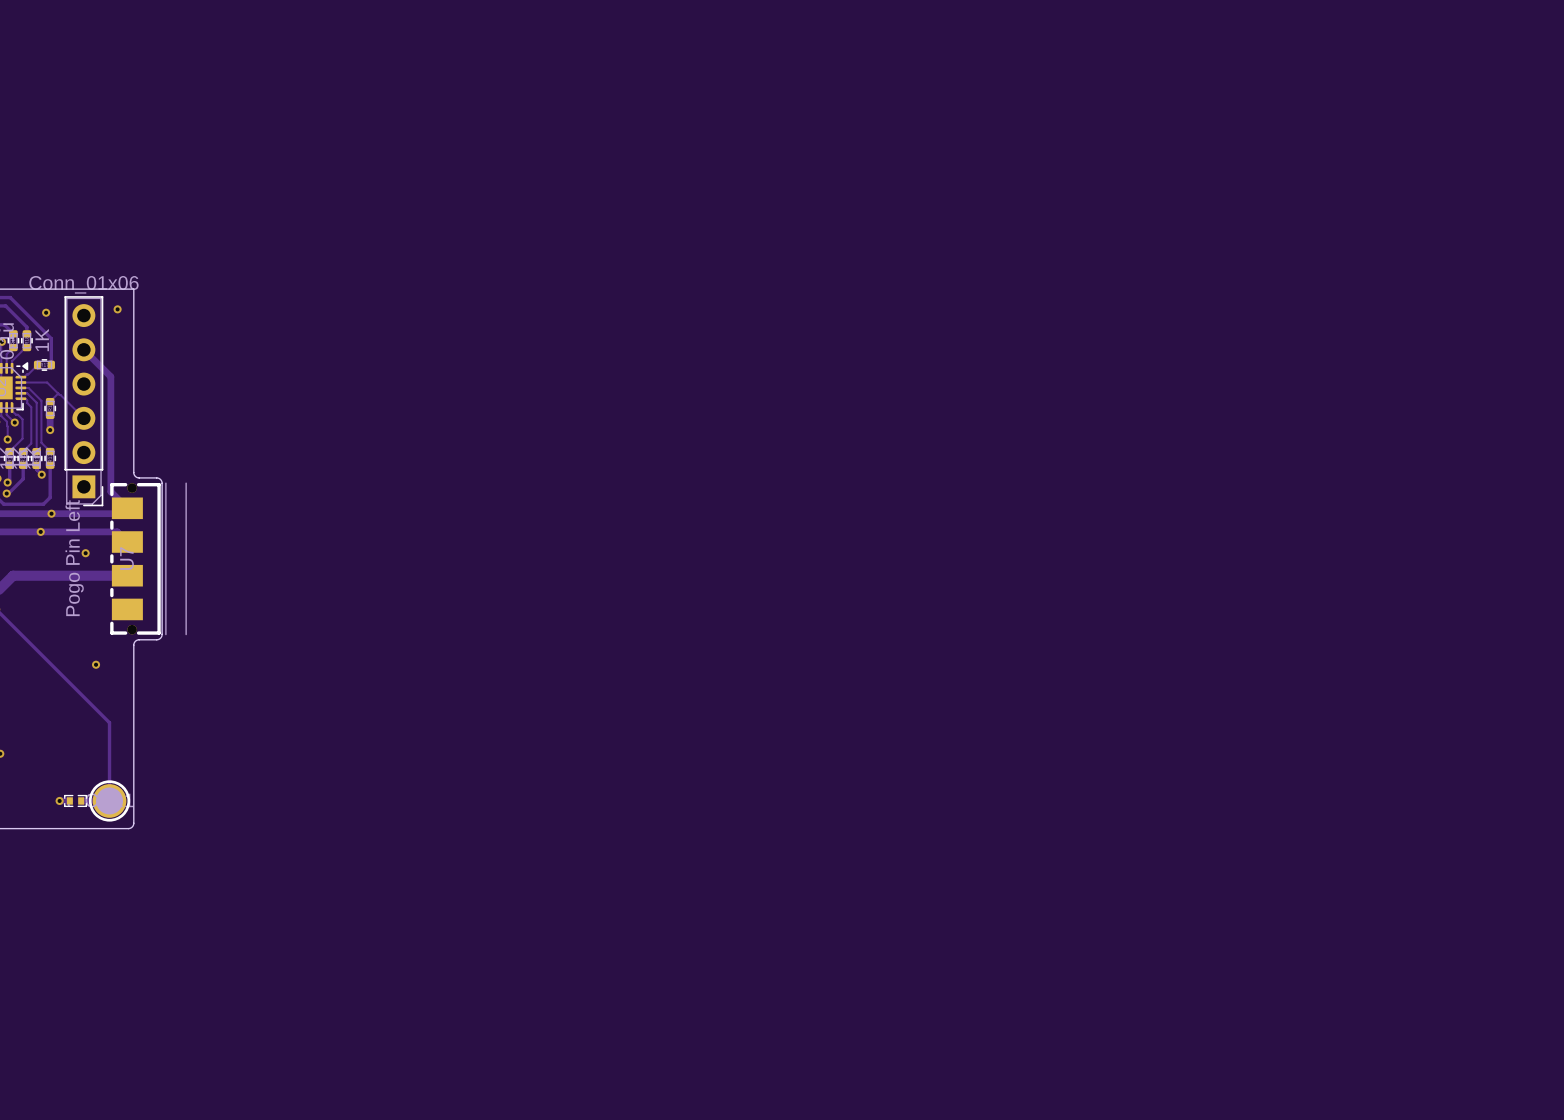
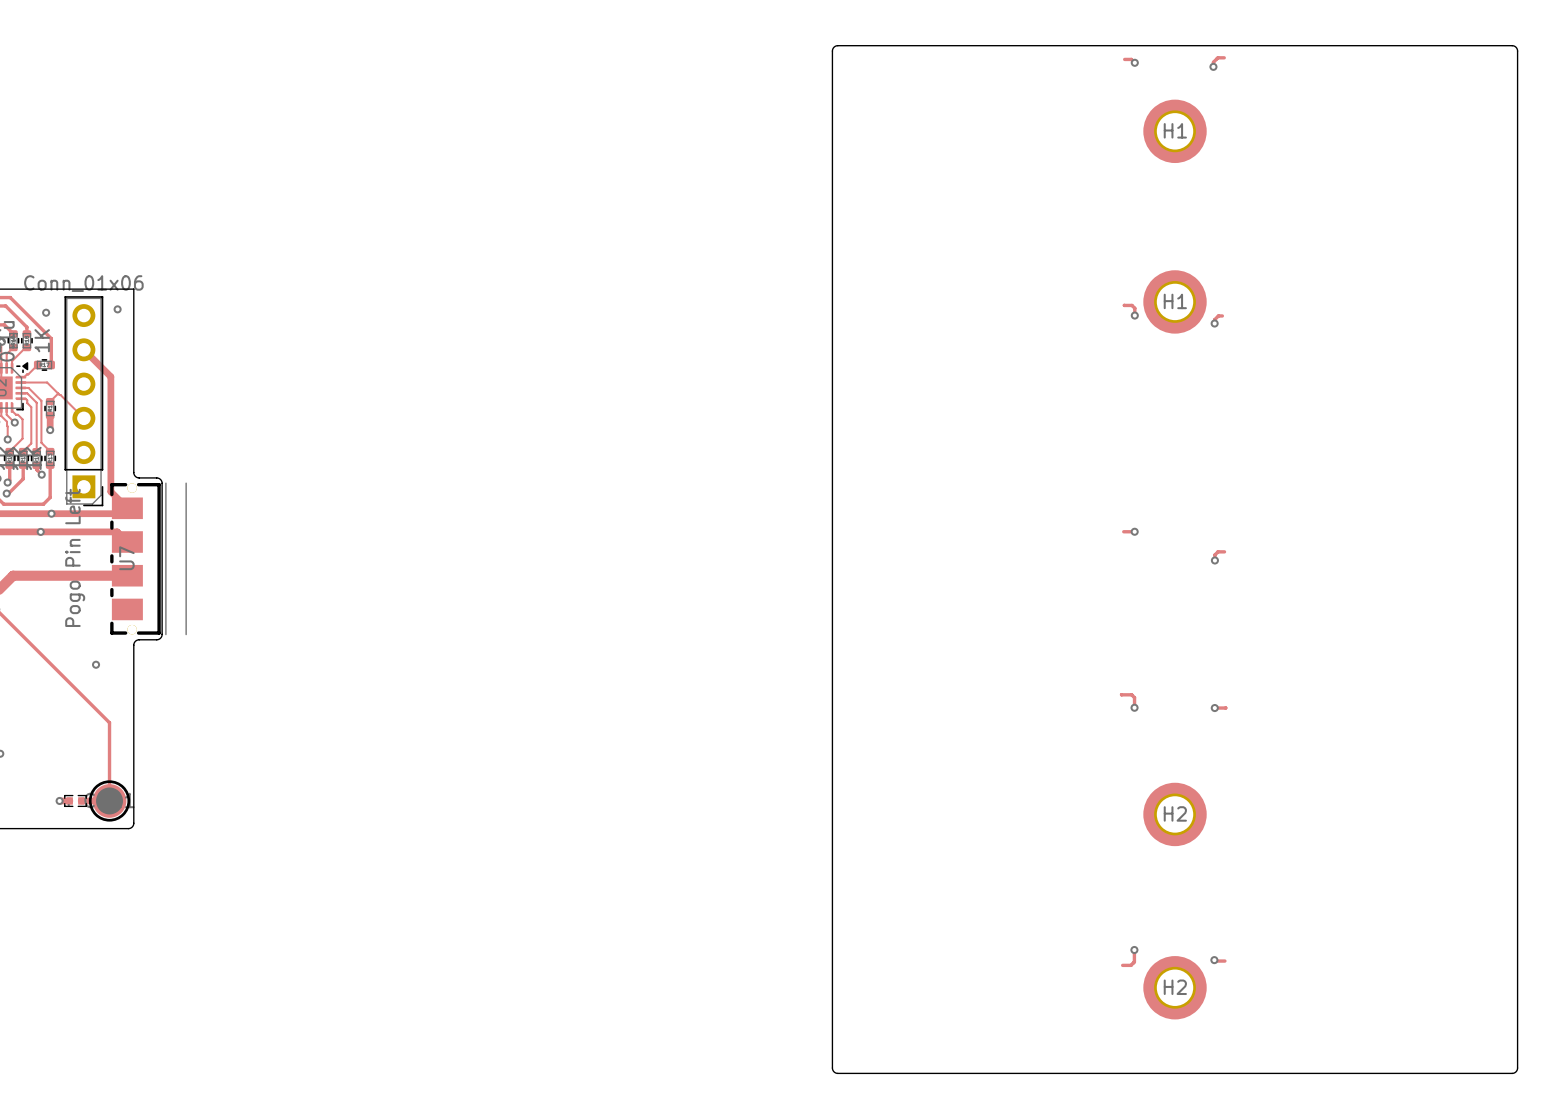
board edge: none -> (837, 45) (1512, 45) (1516, 48) (1517, 1068) (1515, 1072) (837, 1073) (833, 1070) (832, 51) (834, 47) (837, 45)
track: none -> (1224, 57) (1217, 57) (1213, 62) (1213, 66)
track: none -> (1124, 59) (1131, 59) (1134, 62)
via: none -> (1134, 62)
via: none -> (1213, 66)
H1: none -> (1175, 131)
H1: none -> (1175, 301)
track: none -> (1124, 305) (1131, 305) (1134, 308) (1134, 315)
via: none -> (1134, 315)
track: none -> (1222, 315) (1218, 315) (1214, 319) (1214, 323)
via: none -> (1214, 323)
track: none -> (1123, 531) (1134, 531)
via: none -> (1134, 531)
track: none -> (1224, 551) (1218, 551) (1214, 554) (1214, 560)
via: (85, 553) -> none
via: none -> (1214, 560)
track: none -> (1121, 694) (1131, 694) (1134, 697) (1134, 707)
via: none -> (1134, 707)
track: none -> (1214, 708) (1225, 708)
via: none -> (1214, 708)
H2: none -> (1175, 814)
track: none -> (1134, 949) (1134, 962) (1131, 965) (1122, 965)
via: none -> (1134, 949)
track: none -> (1214, 960) (1224, 961)
via: none -> (1214, 960)
H2: none -> (1175, 987)

